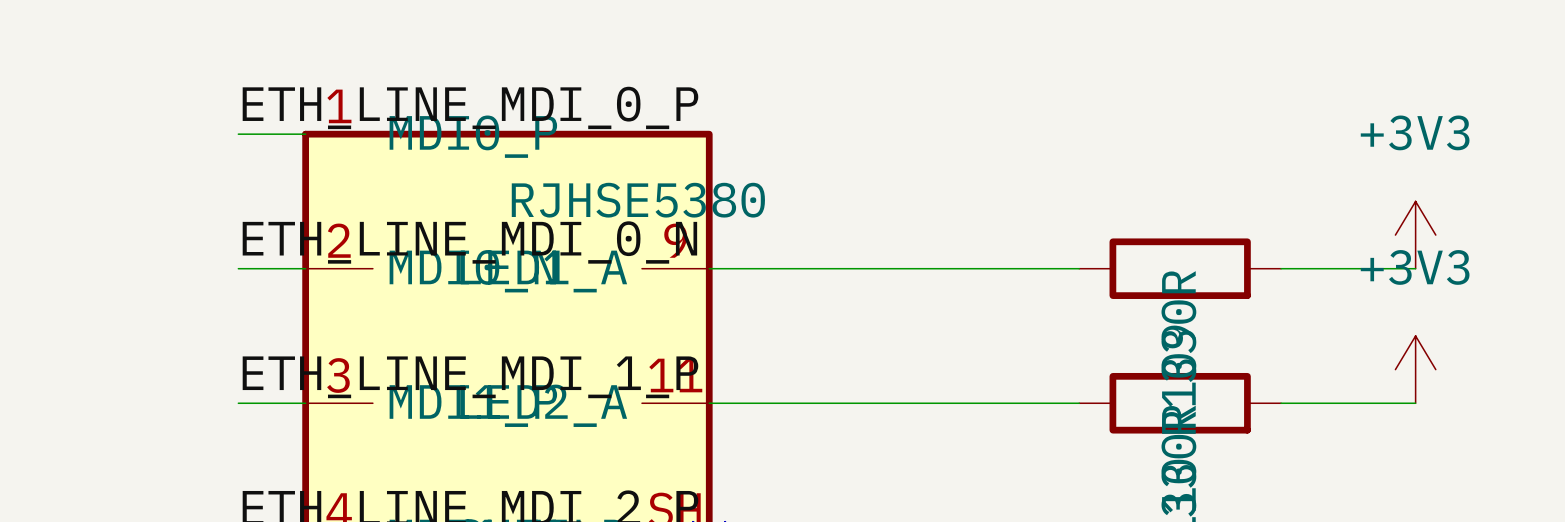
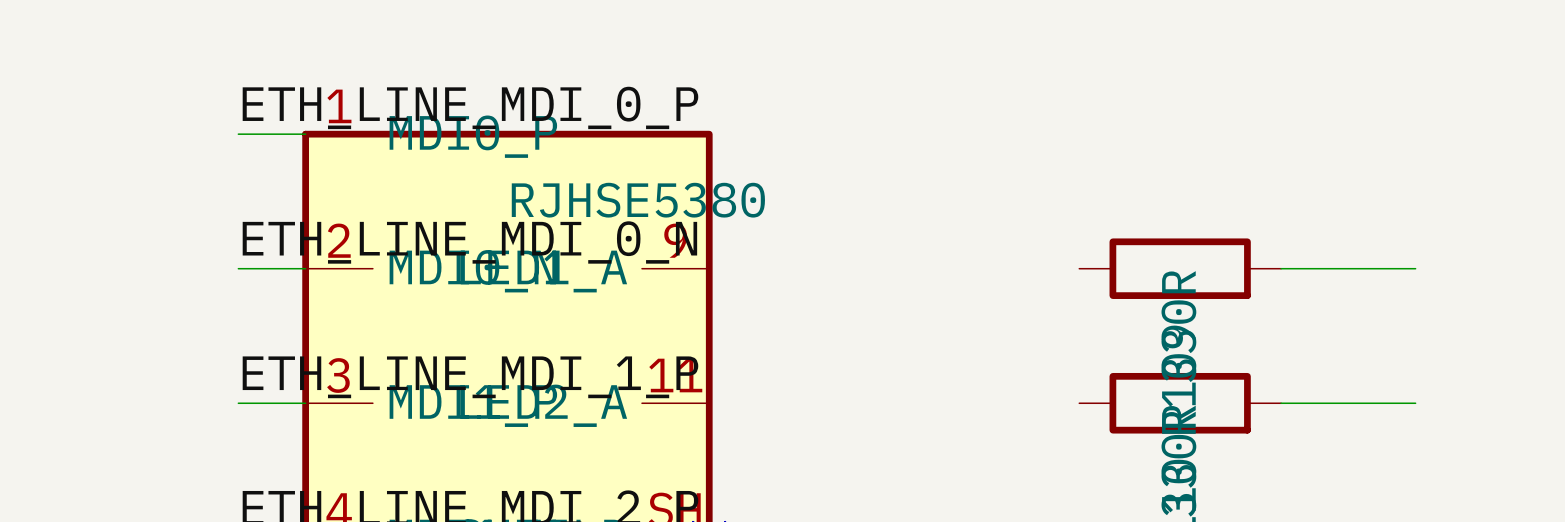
power symbol: +3V3 (1415, 235) -> none
wire: (709, 268) (1079, 268) -> none
power symbol: +3V3 (1415, 369) -> none
wire: (709, 403) (1079, 403) -> none

